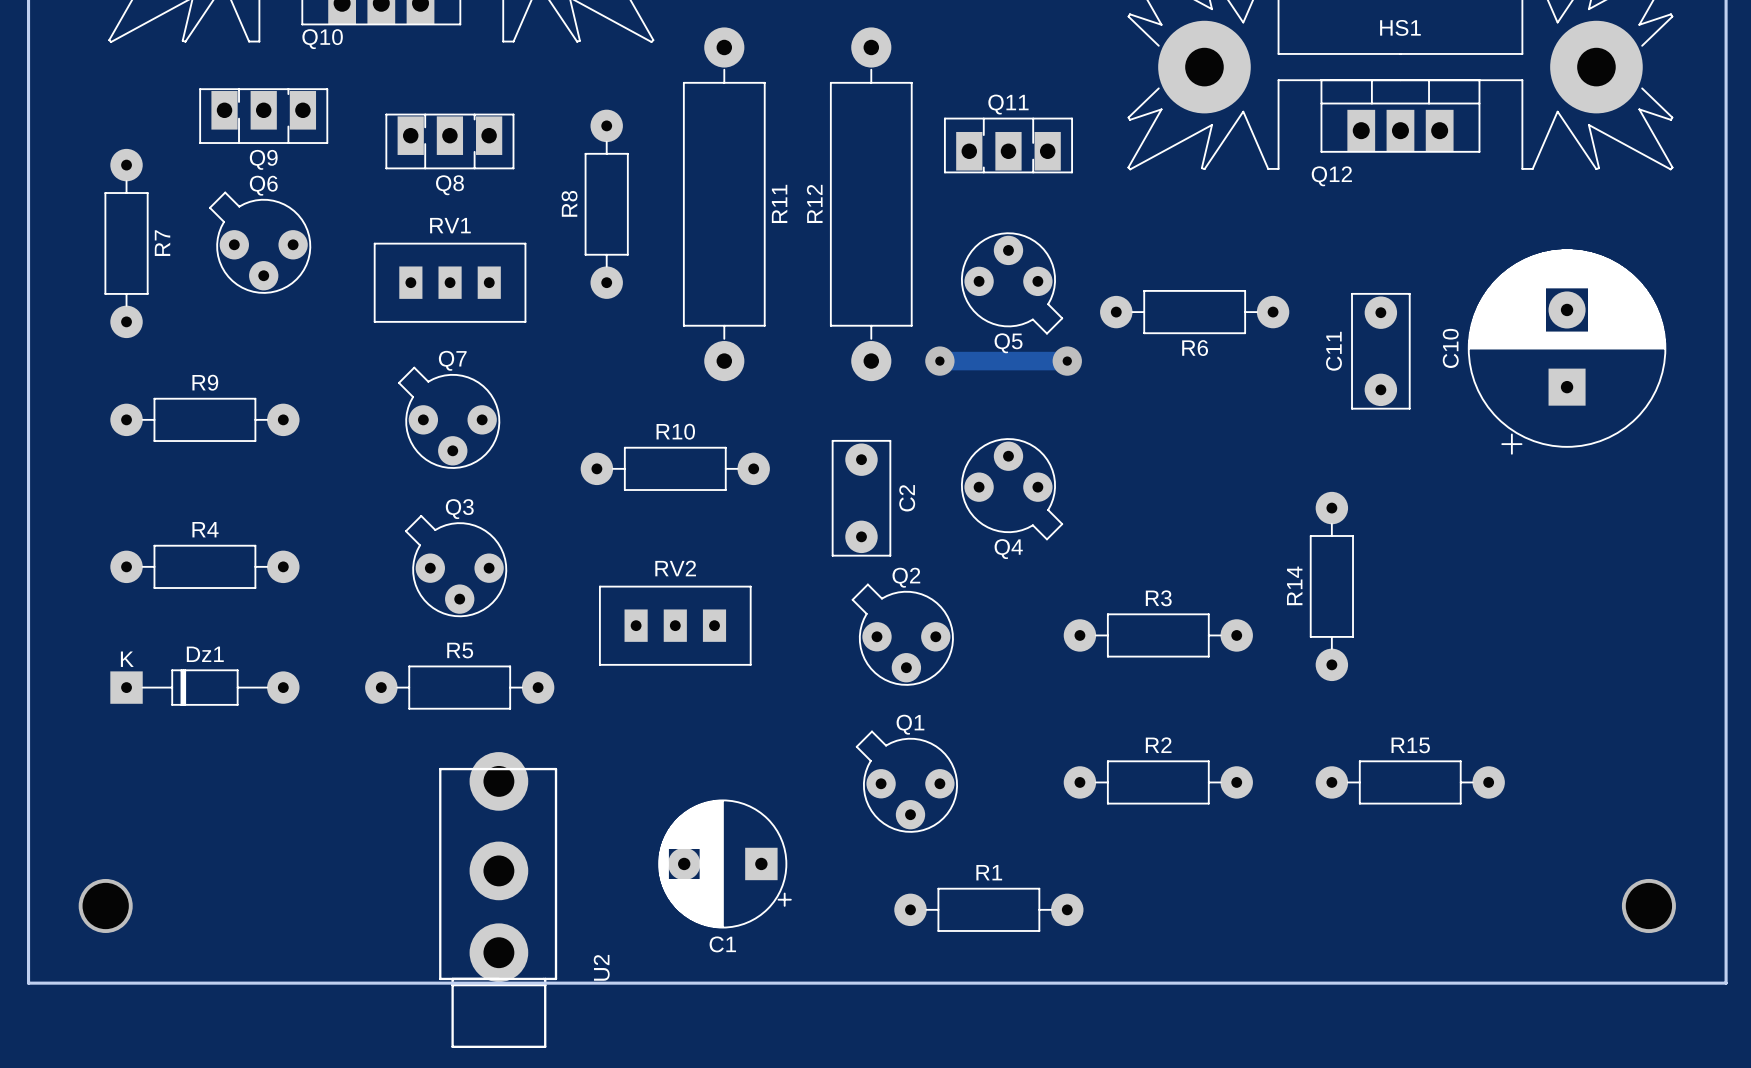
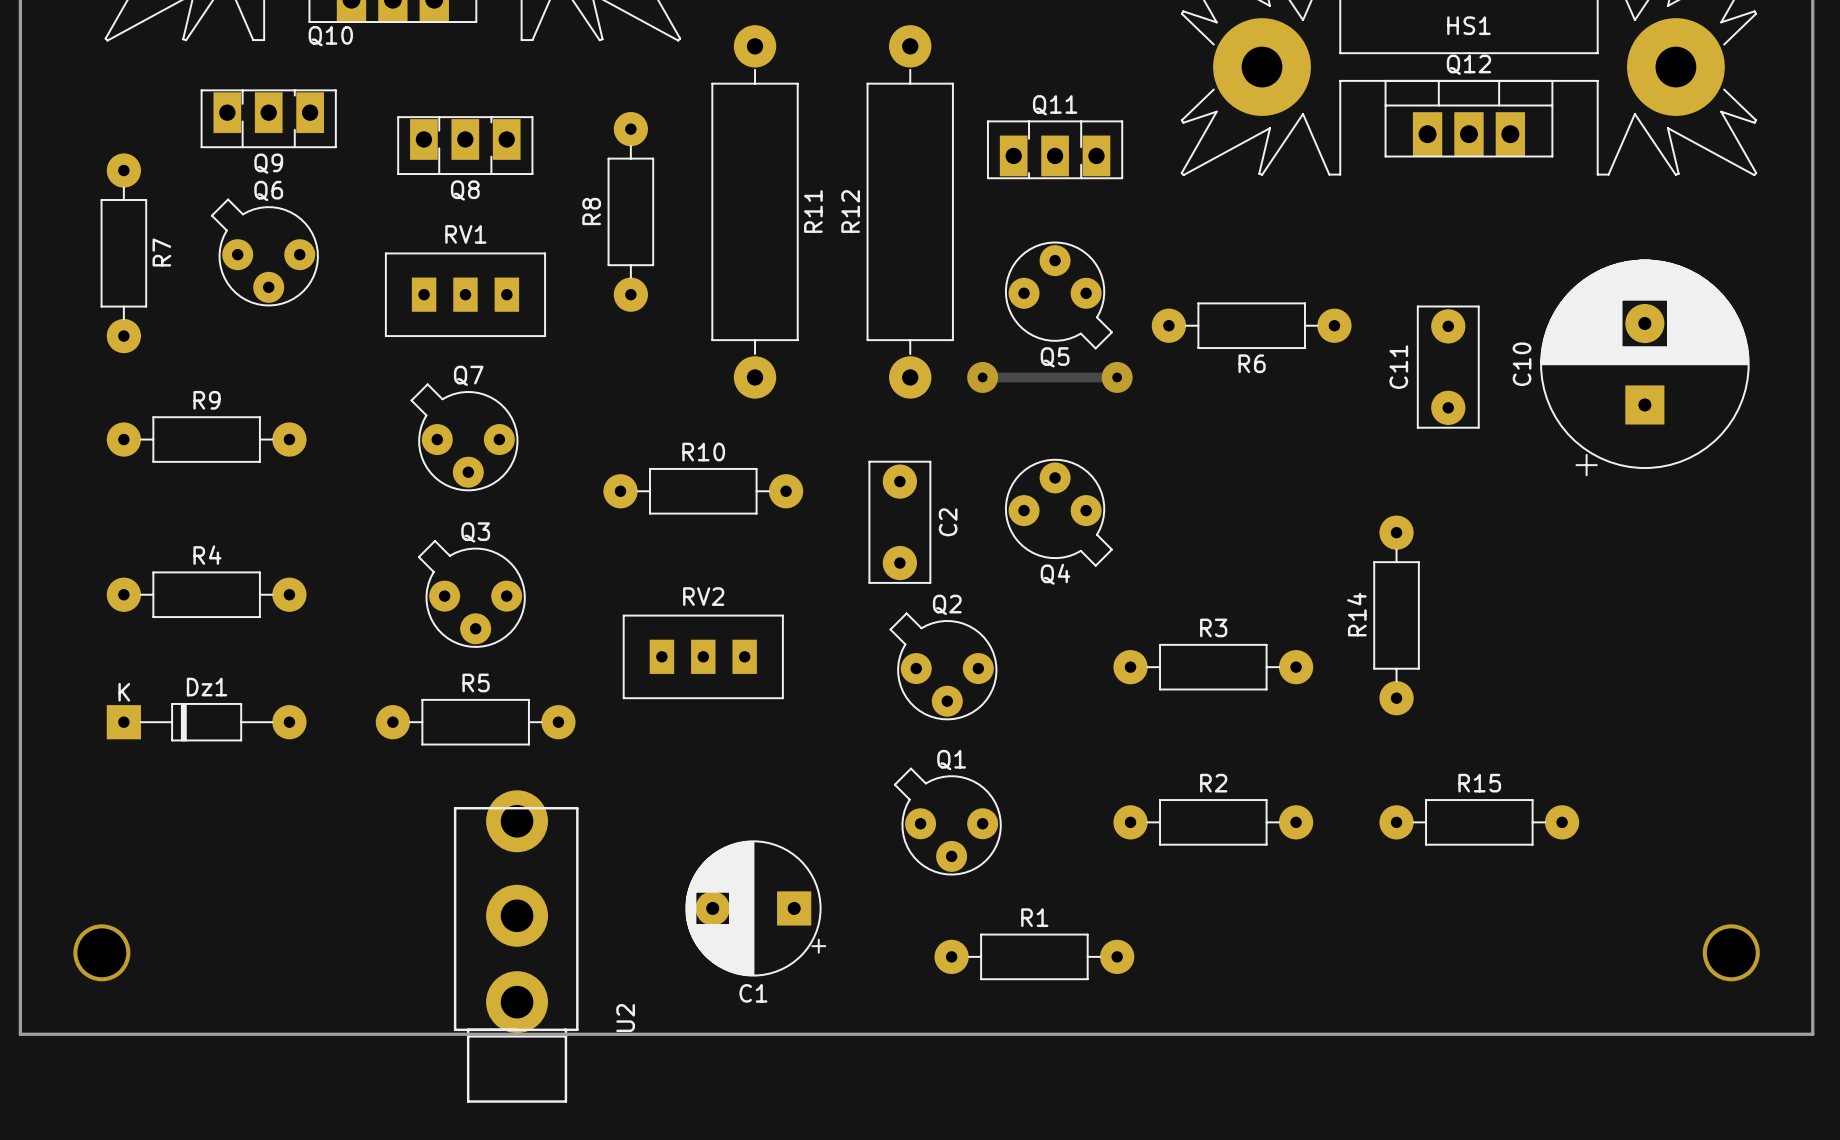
Q12 name position: Q12 (1331, 176) -> Q12 (1468, 64)
track width: thick (939, 361) (1067, 361) -> thin (982, 377) (1117, 377)

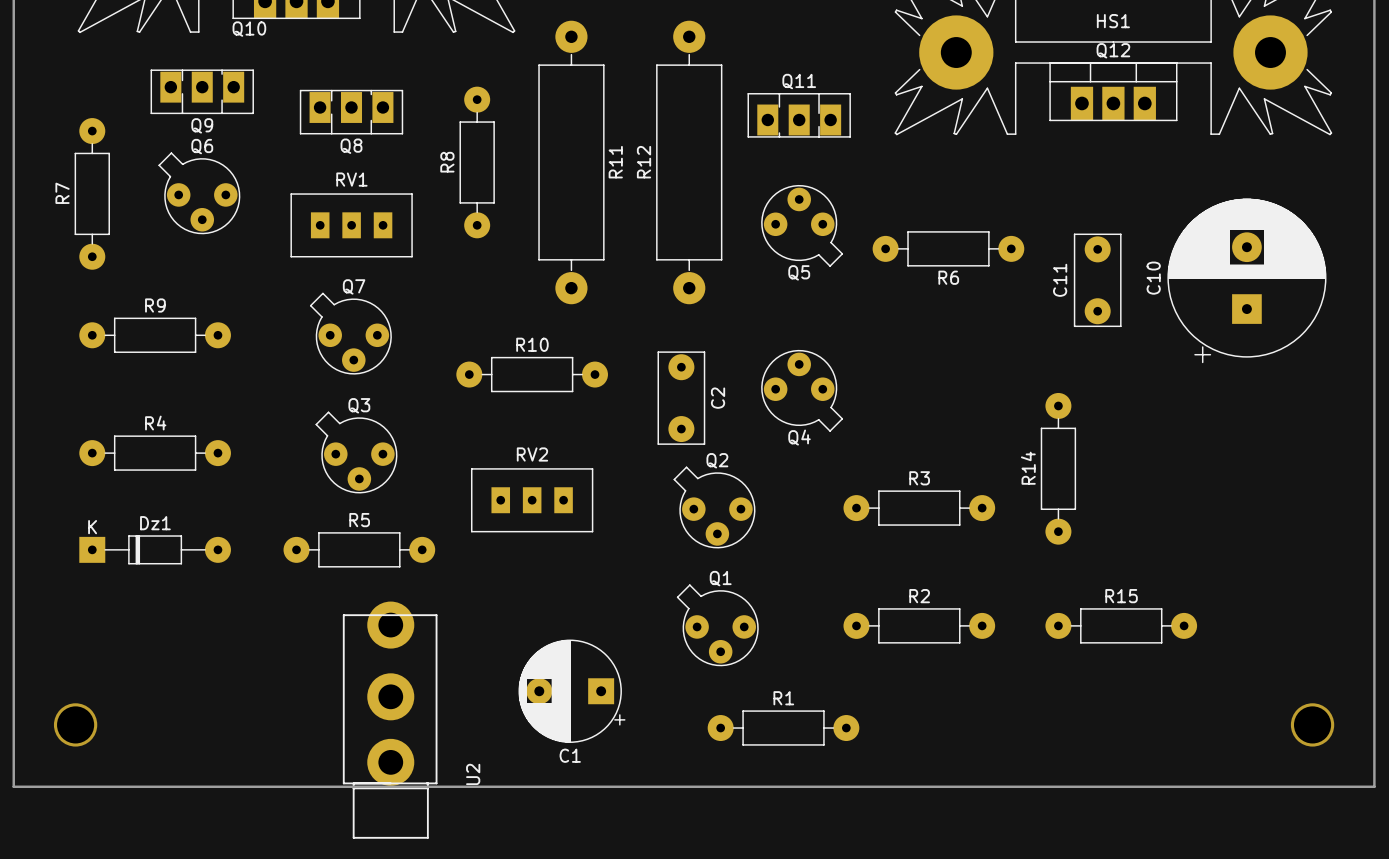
R7 name position: R7 (161, 252) -> R7 (62, 193)
track: (982, 377) (1117, 377) -> none
via: (982, 377) -> none
via: (1117, 377) -> none

